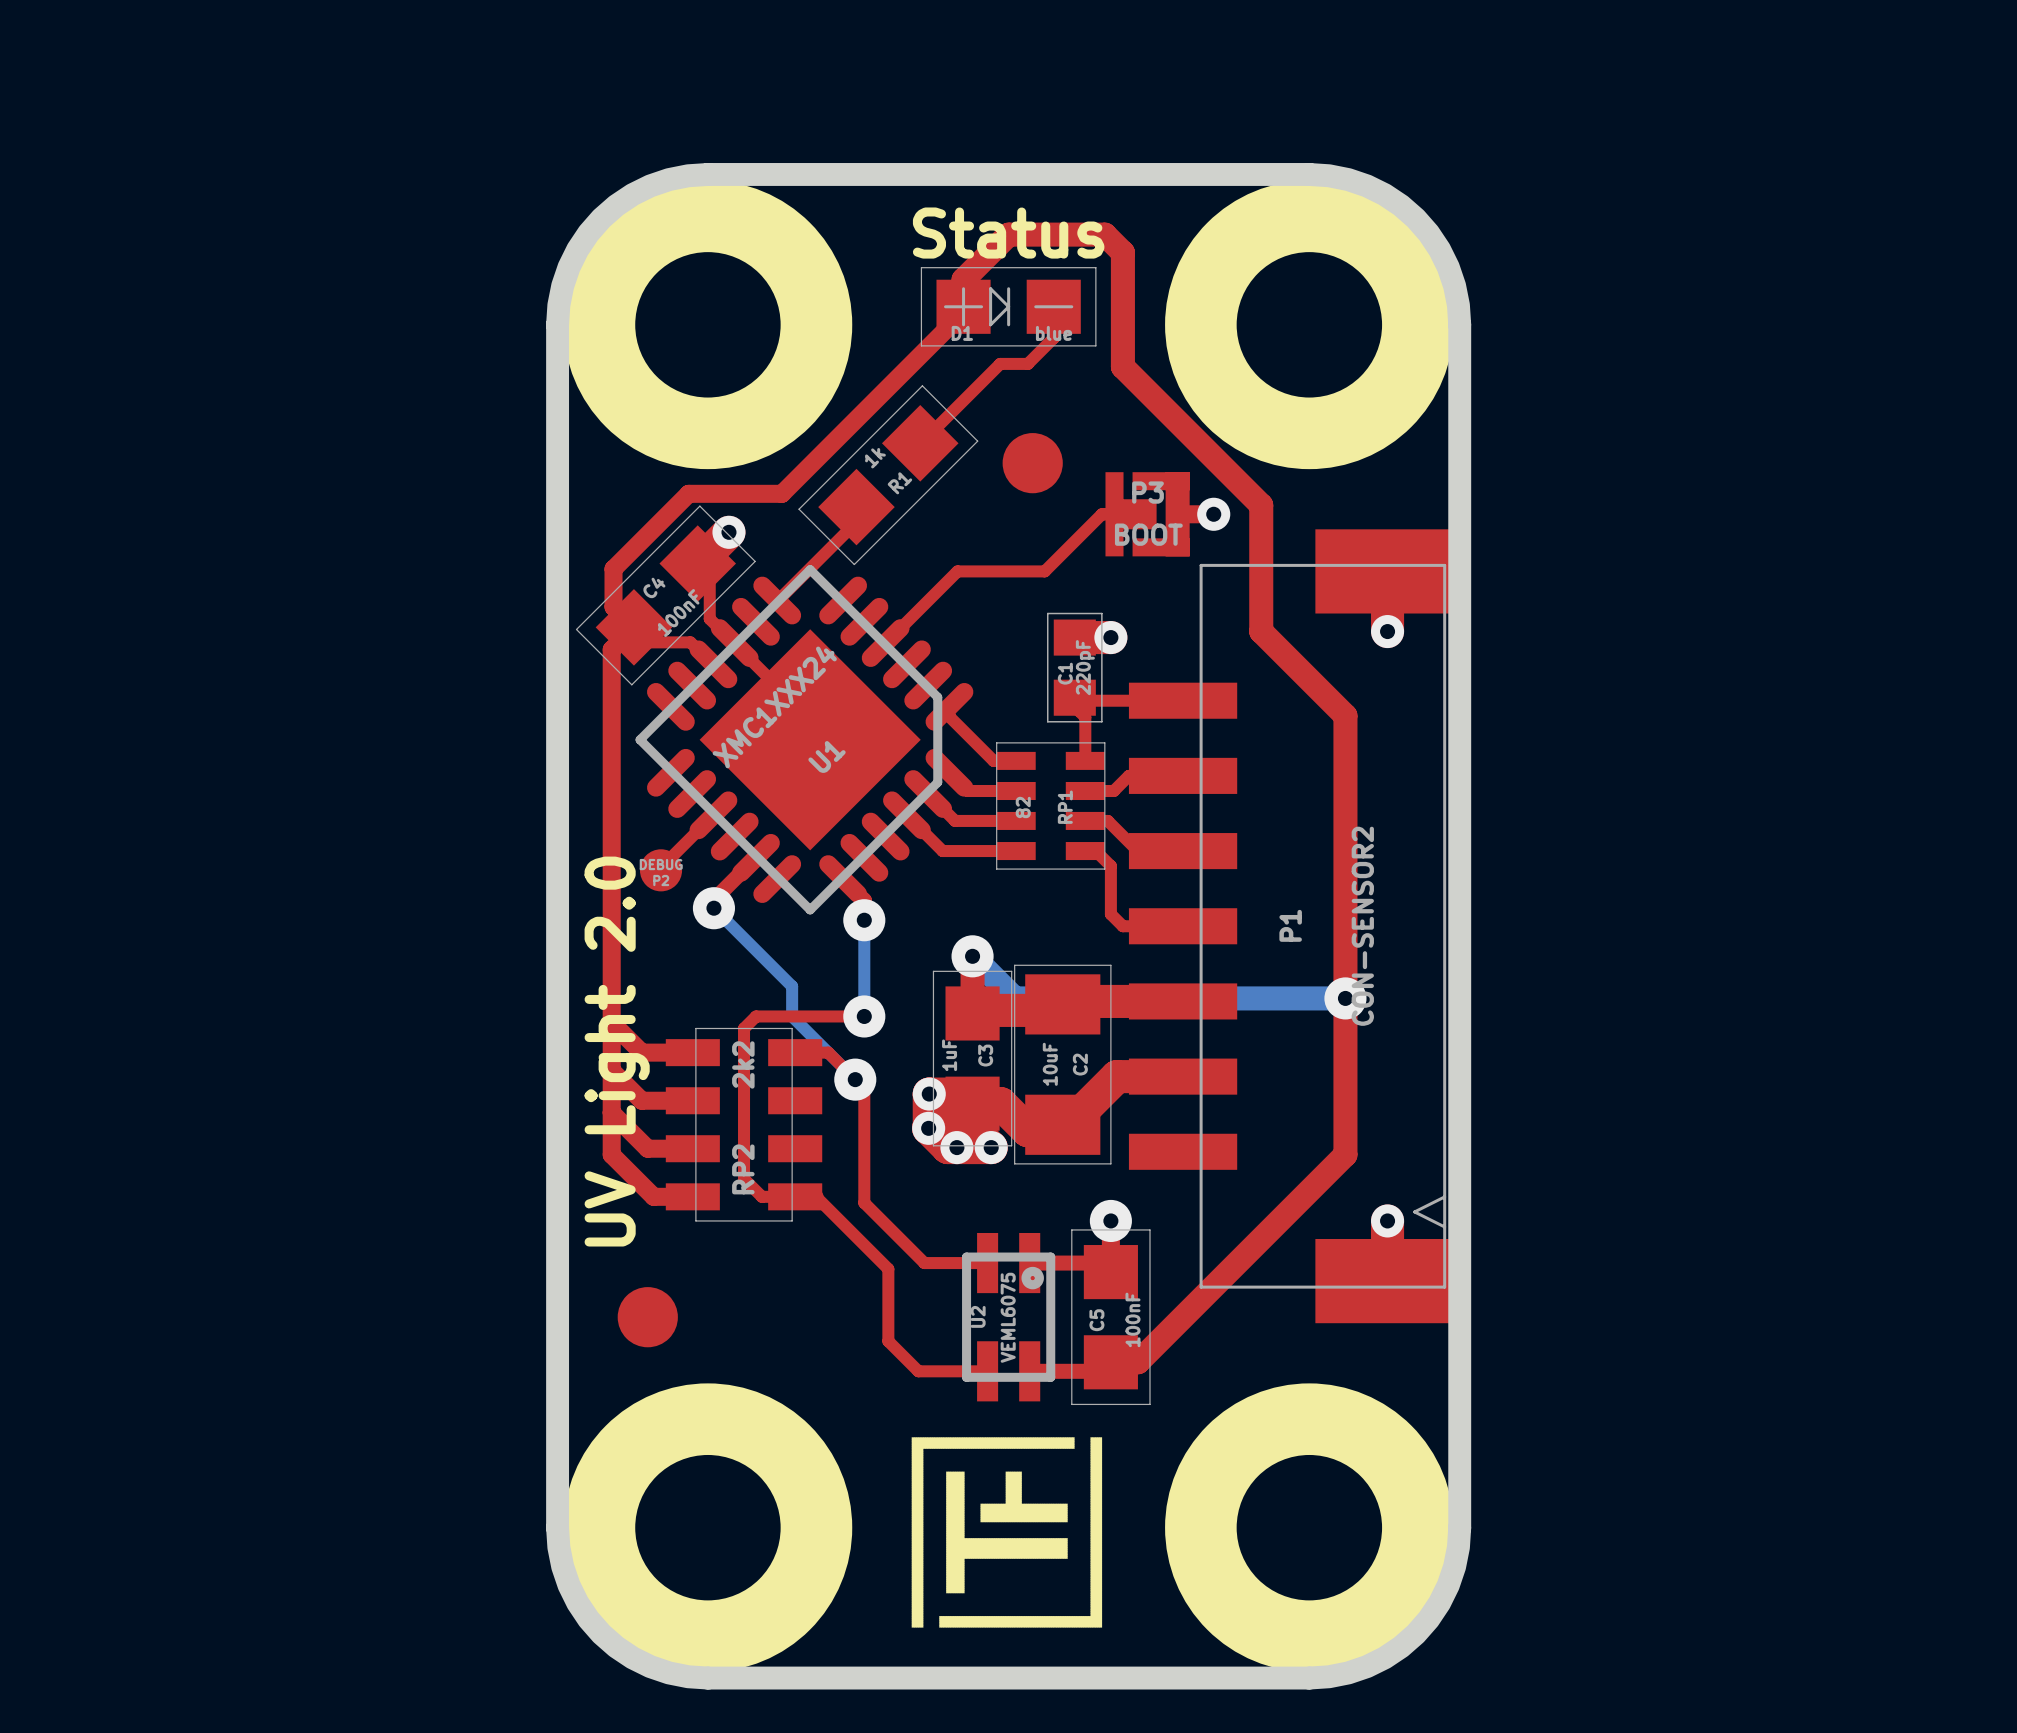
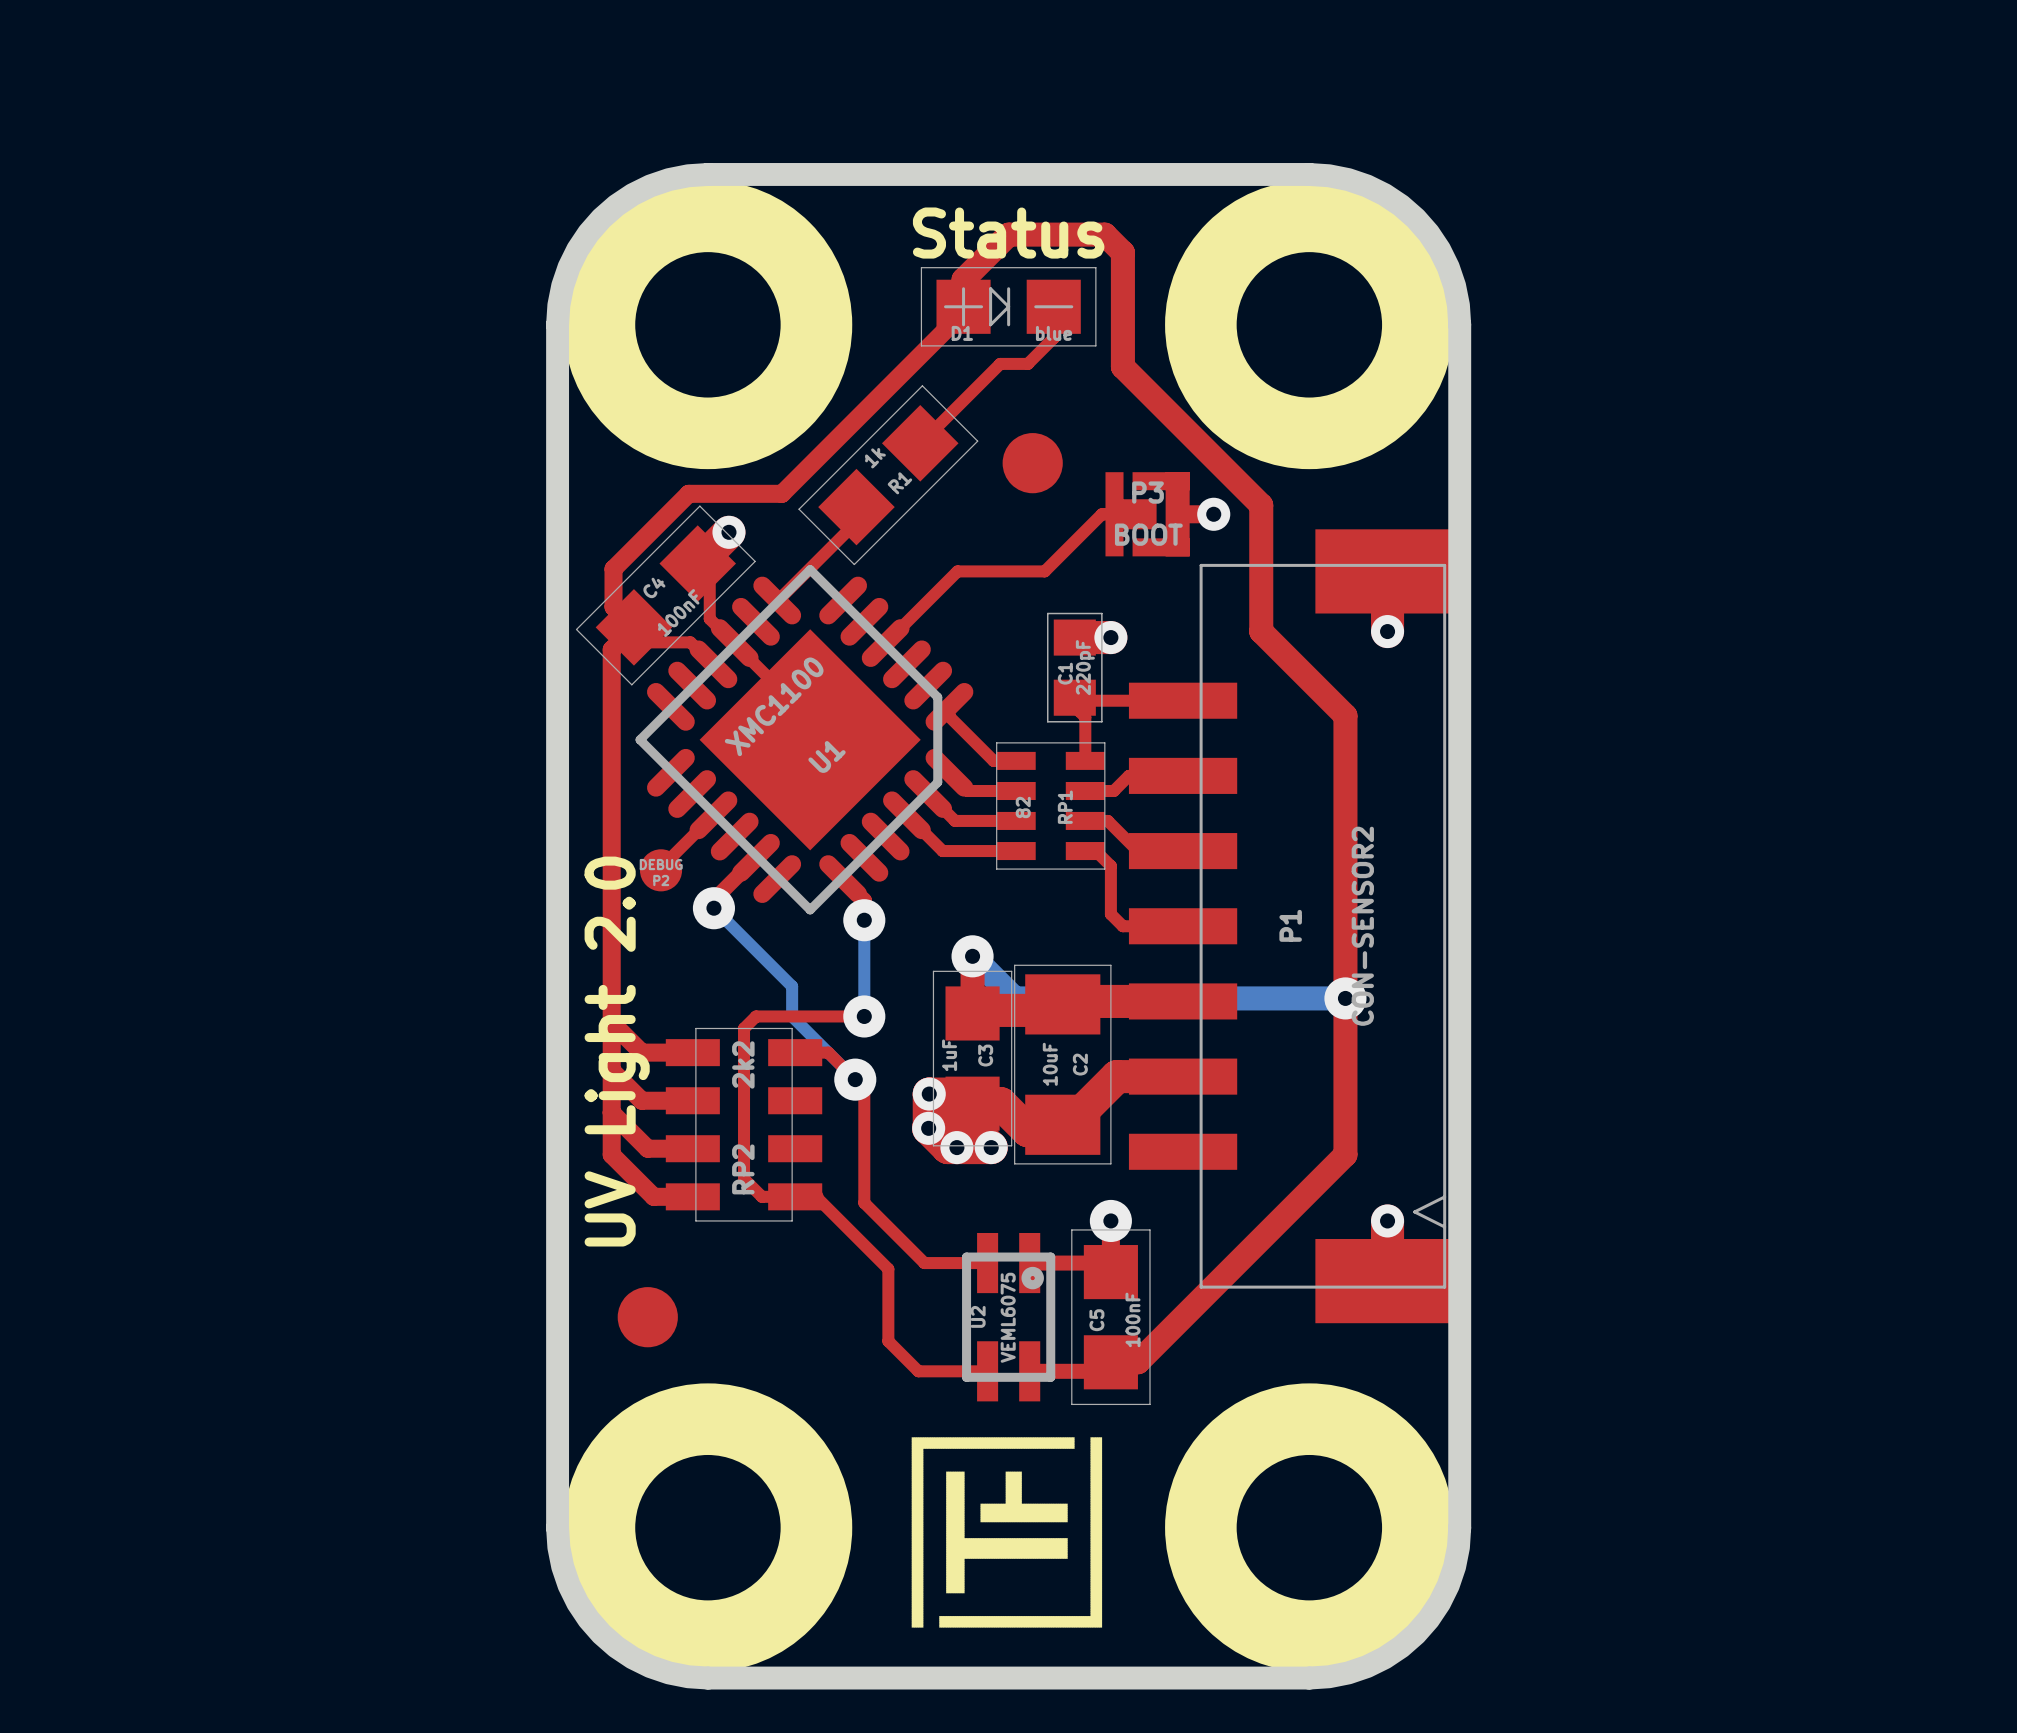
U1 value: XMC1XXX24 (774, 707) -> XMC1100 (774, 706)

